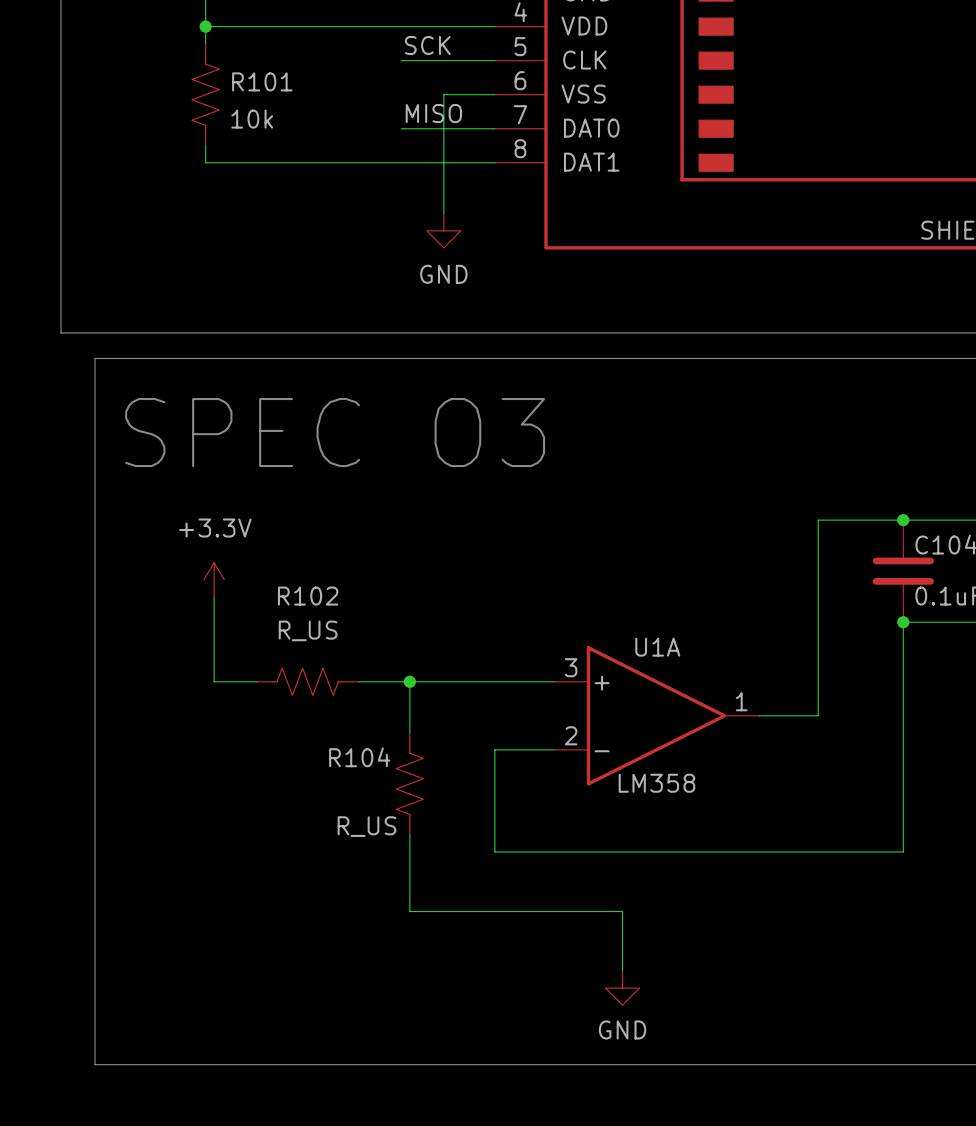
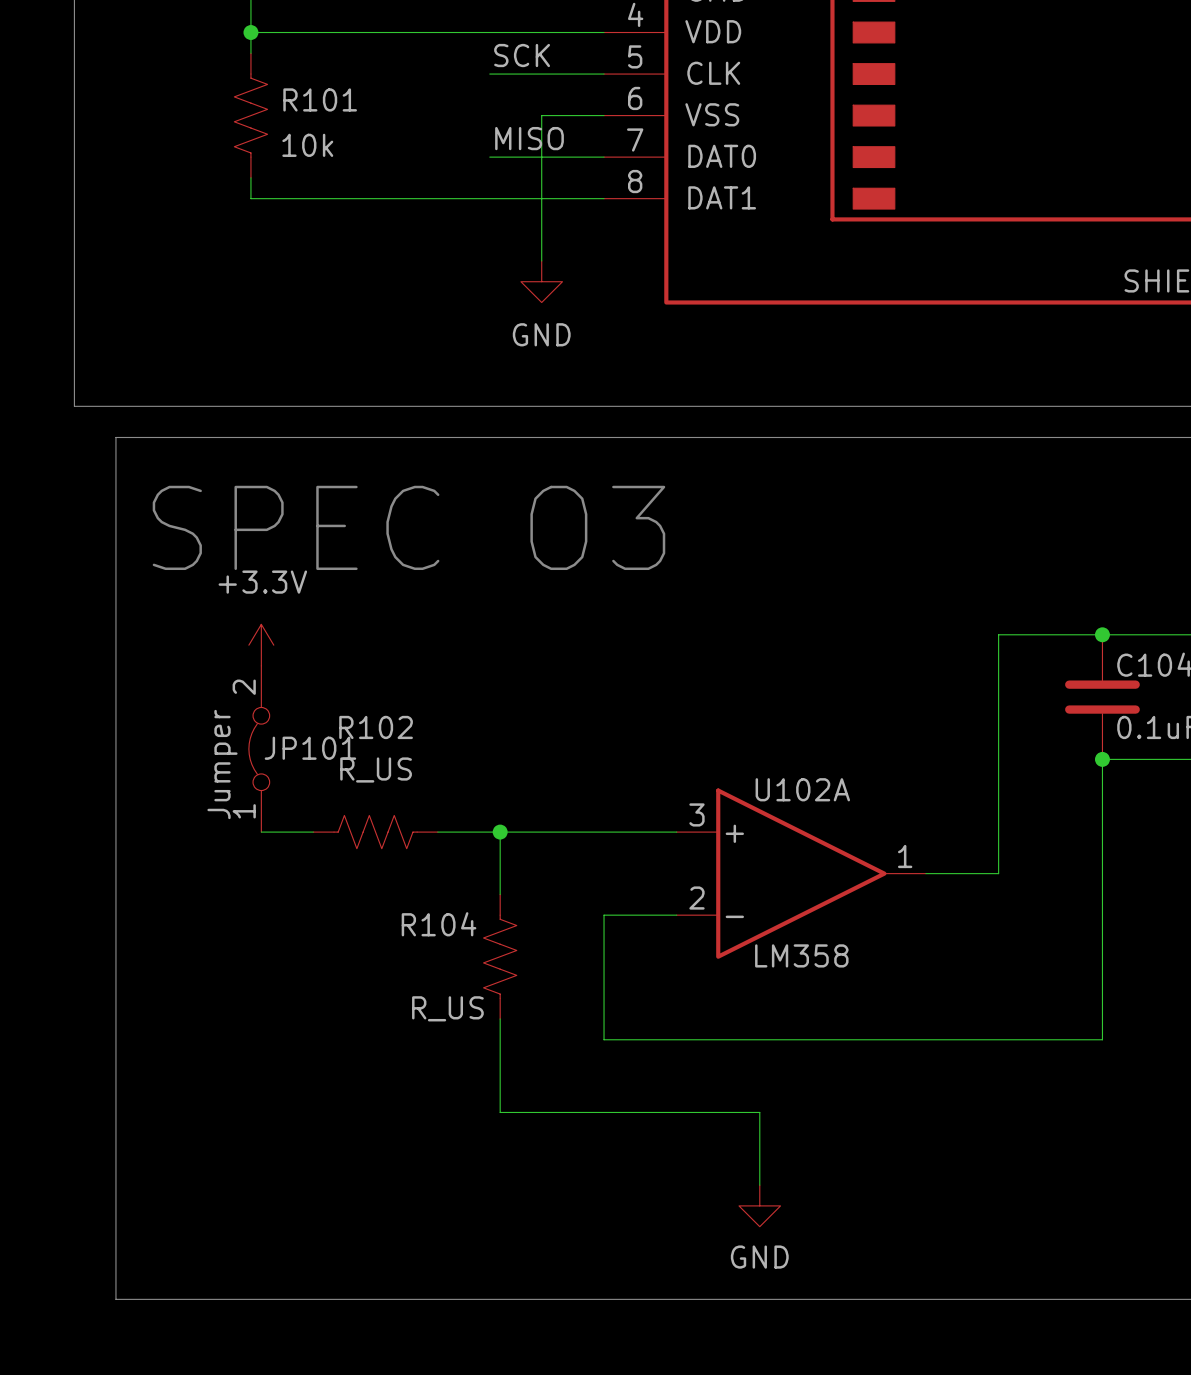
power symbol position: +3.3V (214, 579) -> +3.3V (261, 645)
wire: (214, 596) (214, 681) -> none
JP101: none -> Jumper (259, 749)
U1A name: U1A (657, 647) -> U102A (802, 789)

